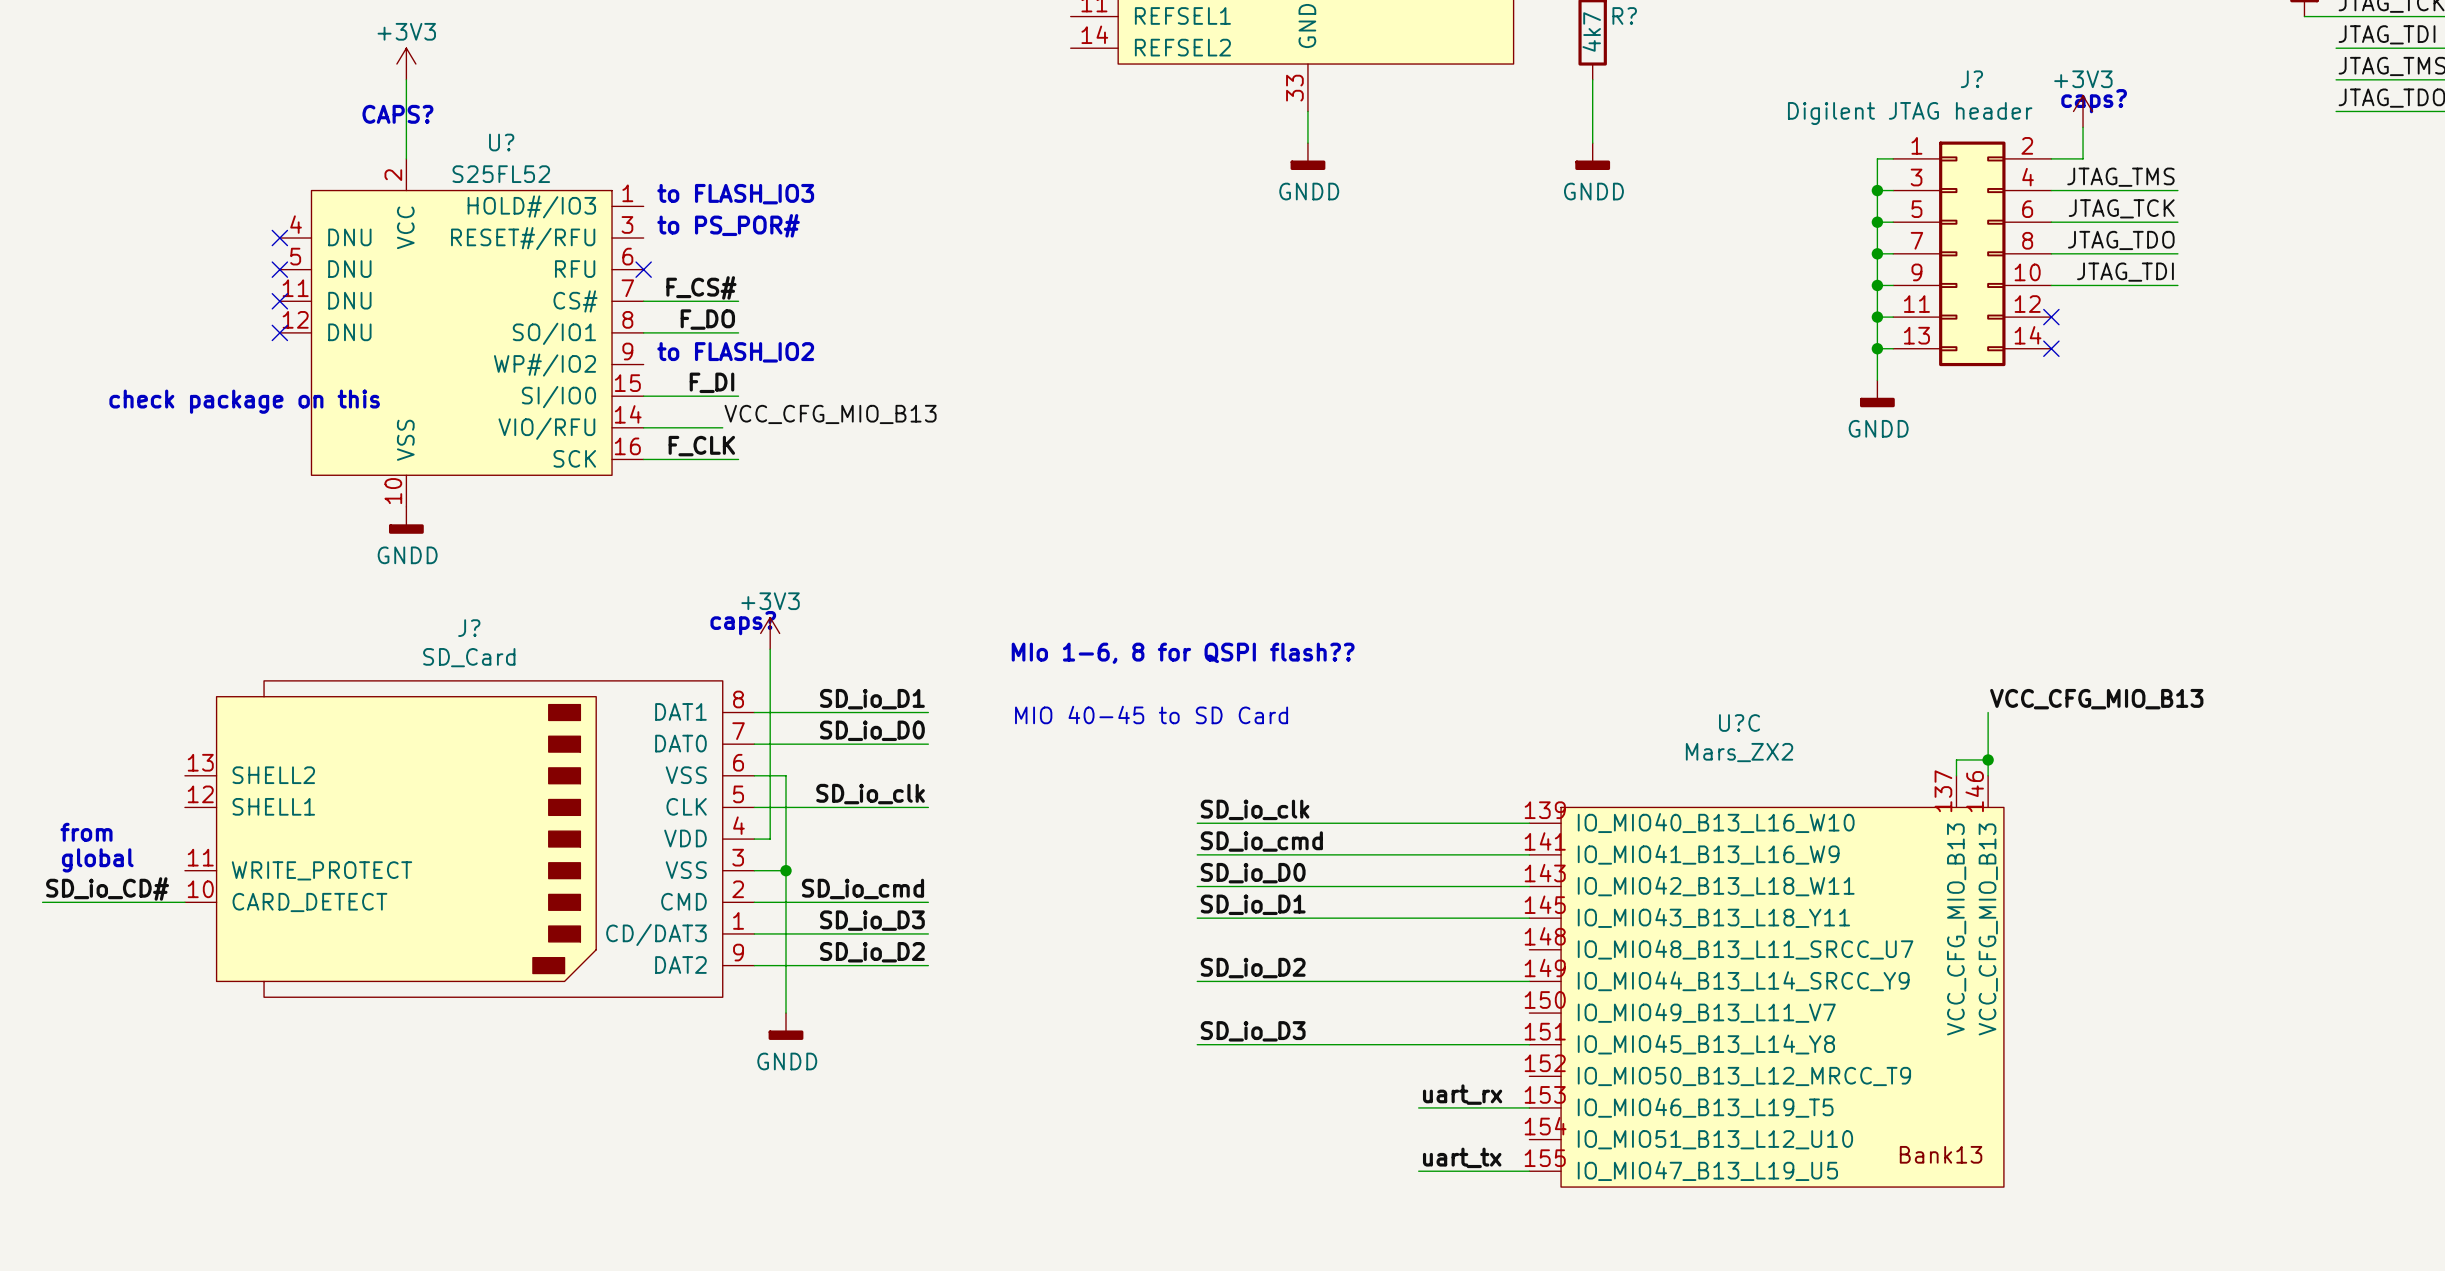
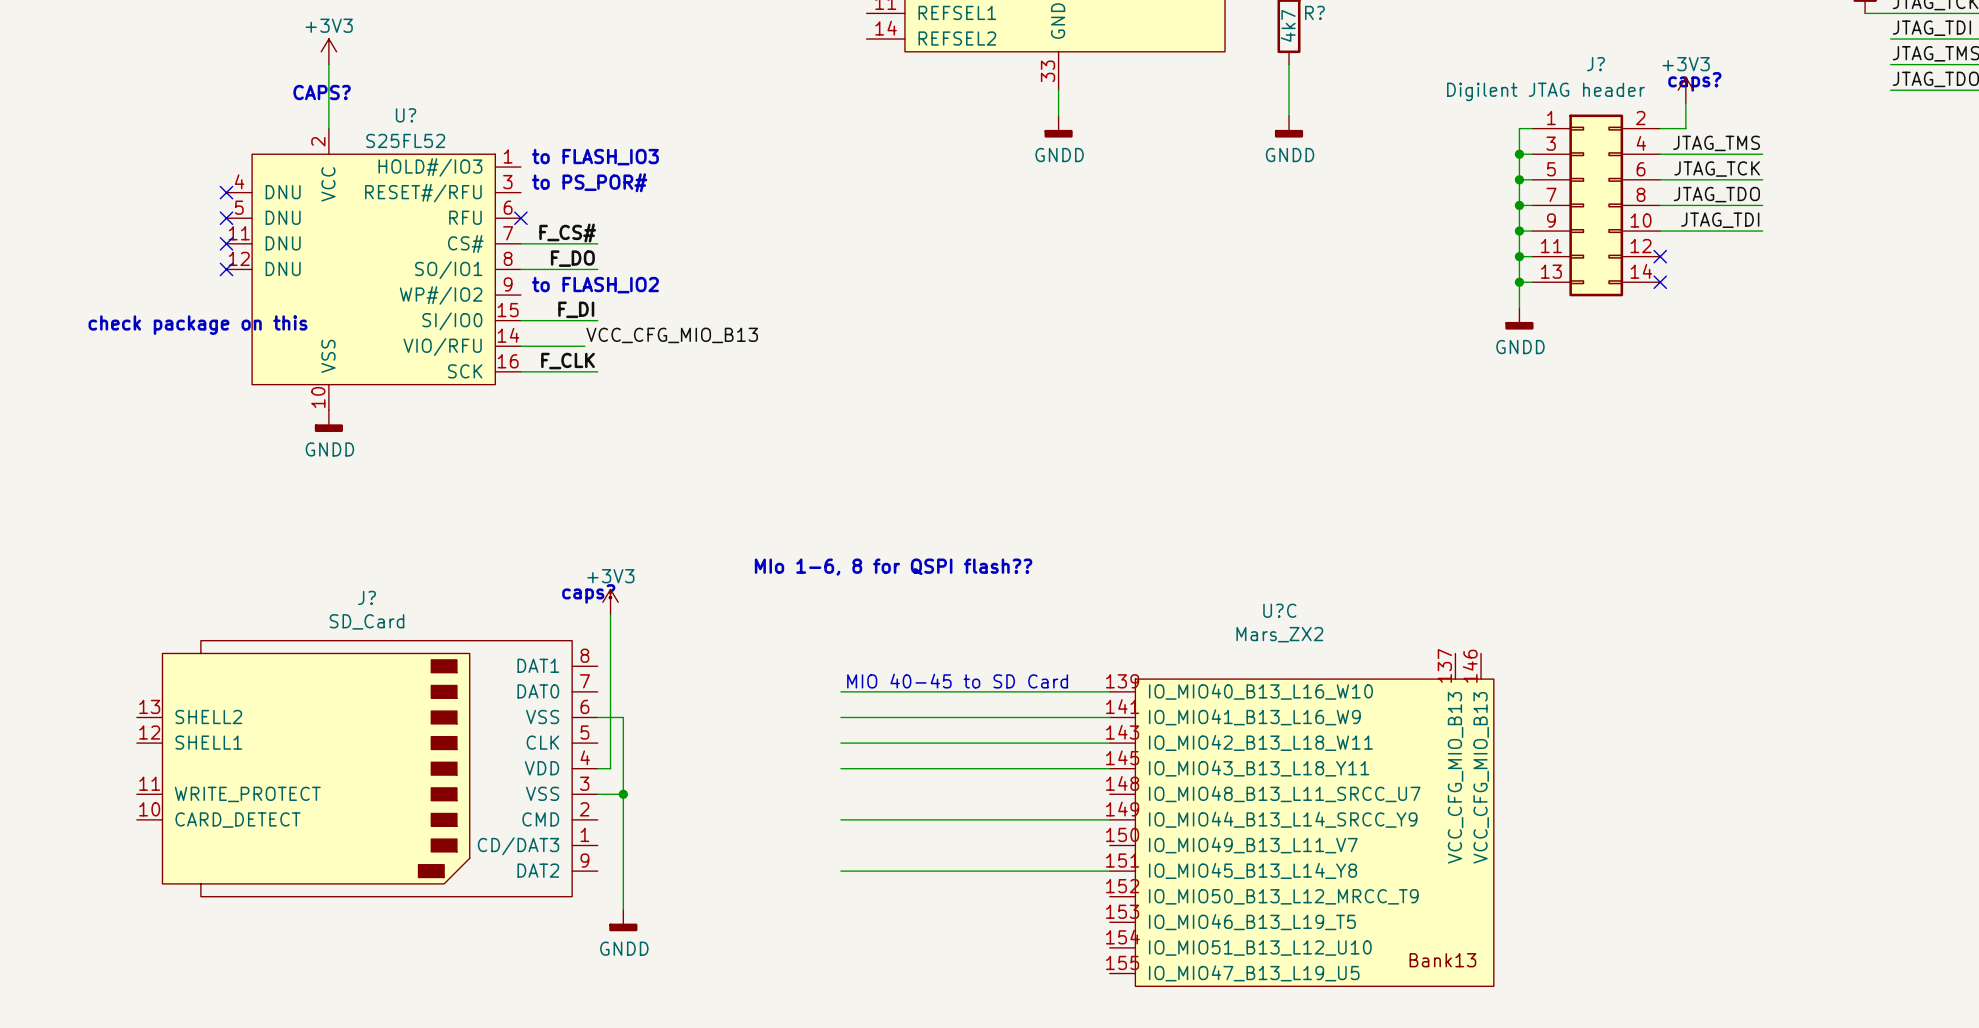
text position: caps? (743, 623) -> caps? (588, 593)
power symbol position: +3V3 (770, 633) -> +3V3 (610, 602)
wire: (770, 649) (770, 839) (754, 839) -> (610, 615) (610, 768) (597, 768)
text position: MIo 1-6, 8 for QSPI flash?? (1183, 653) -> MIo 1-6, 8 for QSPI flash?? (893, 567)
label: SD_io_D1 (872, 699) -> none
label: VCC_CFG_MIO_B13 (2096, 699) -> none
wire: (754, 712) (928, 712) -> none
wire: (1988, 712) (1988, 775) -> none
text position: MIO 40-45 to SD Card (1151, 715) -> MIO 40-45 to SD Card (957, 681)
label: SD_io_D0 (872, 730) -> none
wire: (754, 744) (928, 744) -> none
wire: (1988, 759) (1956, 759) (1956, 775) -> none
junction: (1988, 759) -> none
wire: (754, 775) (786, 775) (786, 1013) -> (597, 717) (623, 717) (623, 909)
label: SD_io_clk (870, 794) -> none
wire: (754, 807) (928, 807) -> none
label: SD_io_clk (1255, 809) -> none
wire: (1197, 823) (1529, 823) -> (840, 871) (1109, 871)
text: from (86, 832) -> none
J? position: (469, 839) -> (367, 768)
label: SD_io_cmd (1261, 841) -> none
wire: none -> (840, 691) (968, 691)
text: global (97, 860) -> none
wire: (754, 870) (786, 870) -> (597, 794) (623, 794)
junction: (786, 870) -> none
label: SD_io_D0 (1253, 873) -> none
wire: none -> (840, 717) (968, 717)
label: SD_io_CD# (107, 888) -> none
label: SD_io_cmd (863, 888) -> none
wire: (42, 902) (184, 902) -> none
wire: (754, 902) (928, 902) -> none
label: SD_io_D1 (1253, 904) -> none
wire: none -> (840, 743) (968, 743)
label: SD_io_D3 (872, 920) -> none
wire: (754, 933) (928, 933) -> none
label: SD_io_D2 (872, 952) -> none
wire: (754, 965) (928, 965) -> none
label: SD_io_D2 (1253, 968) -> none
junction: none -> (623, 794)
wire: (1197, 981) (1529, 981) -> (840, 768) (1109, 768)
U?C position: (1766, 981) -> (1301, 819)
power symbol position: GNDD (786, 1026) -> GNDD (623, 920)
label: SD_io_D3 (1253, 1031) -> none
wire: (1197, 1044) (1529, 1044) -> (840, 819) (1109, 819)
label: uart_rx (1462, 1094) -> none
label: uart_tx (1462, 1157) -> none

